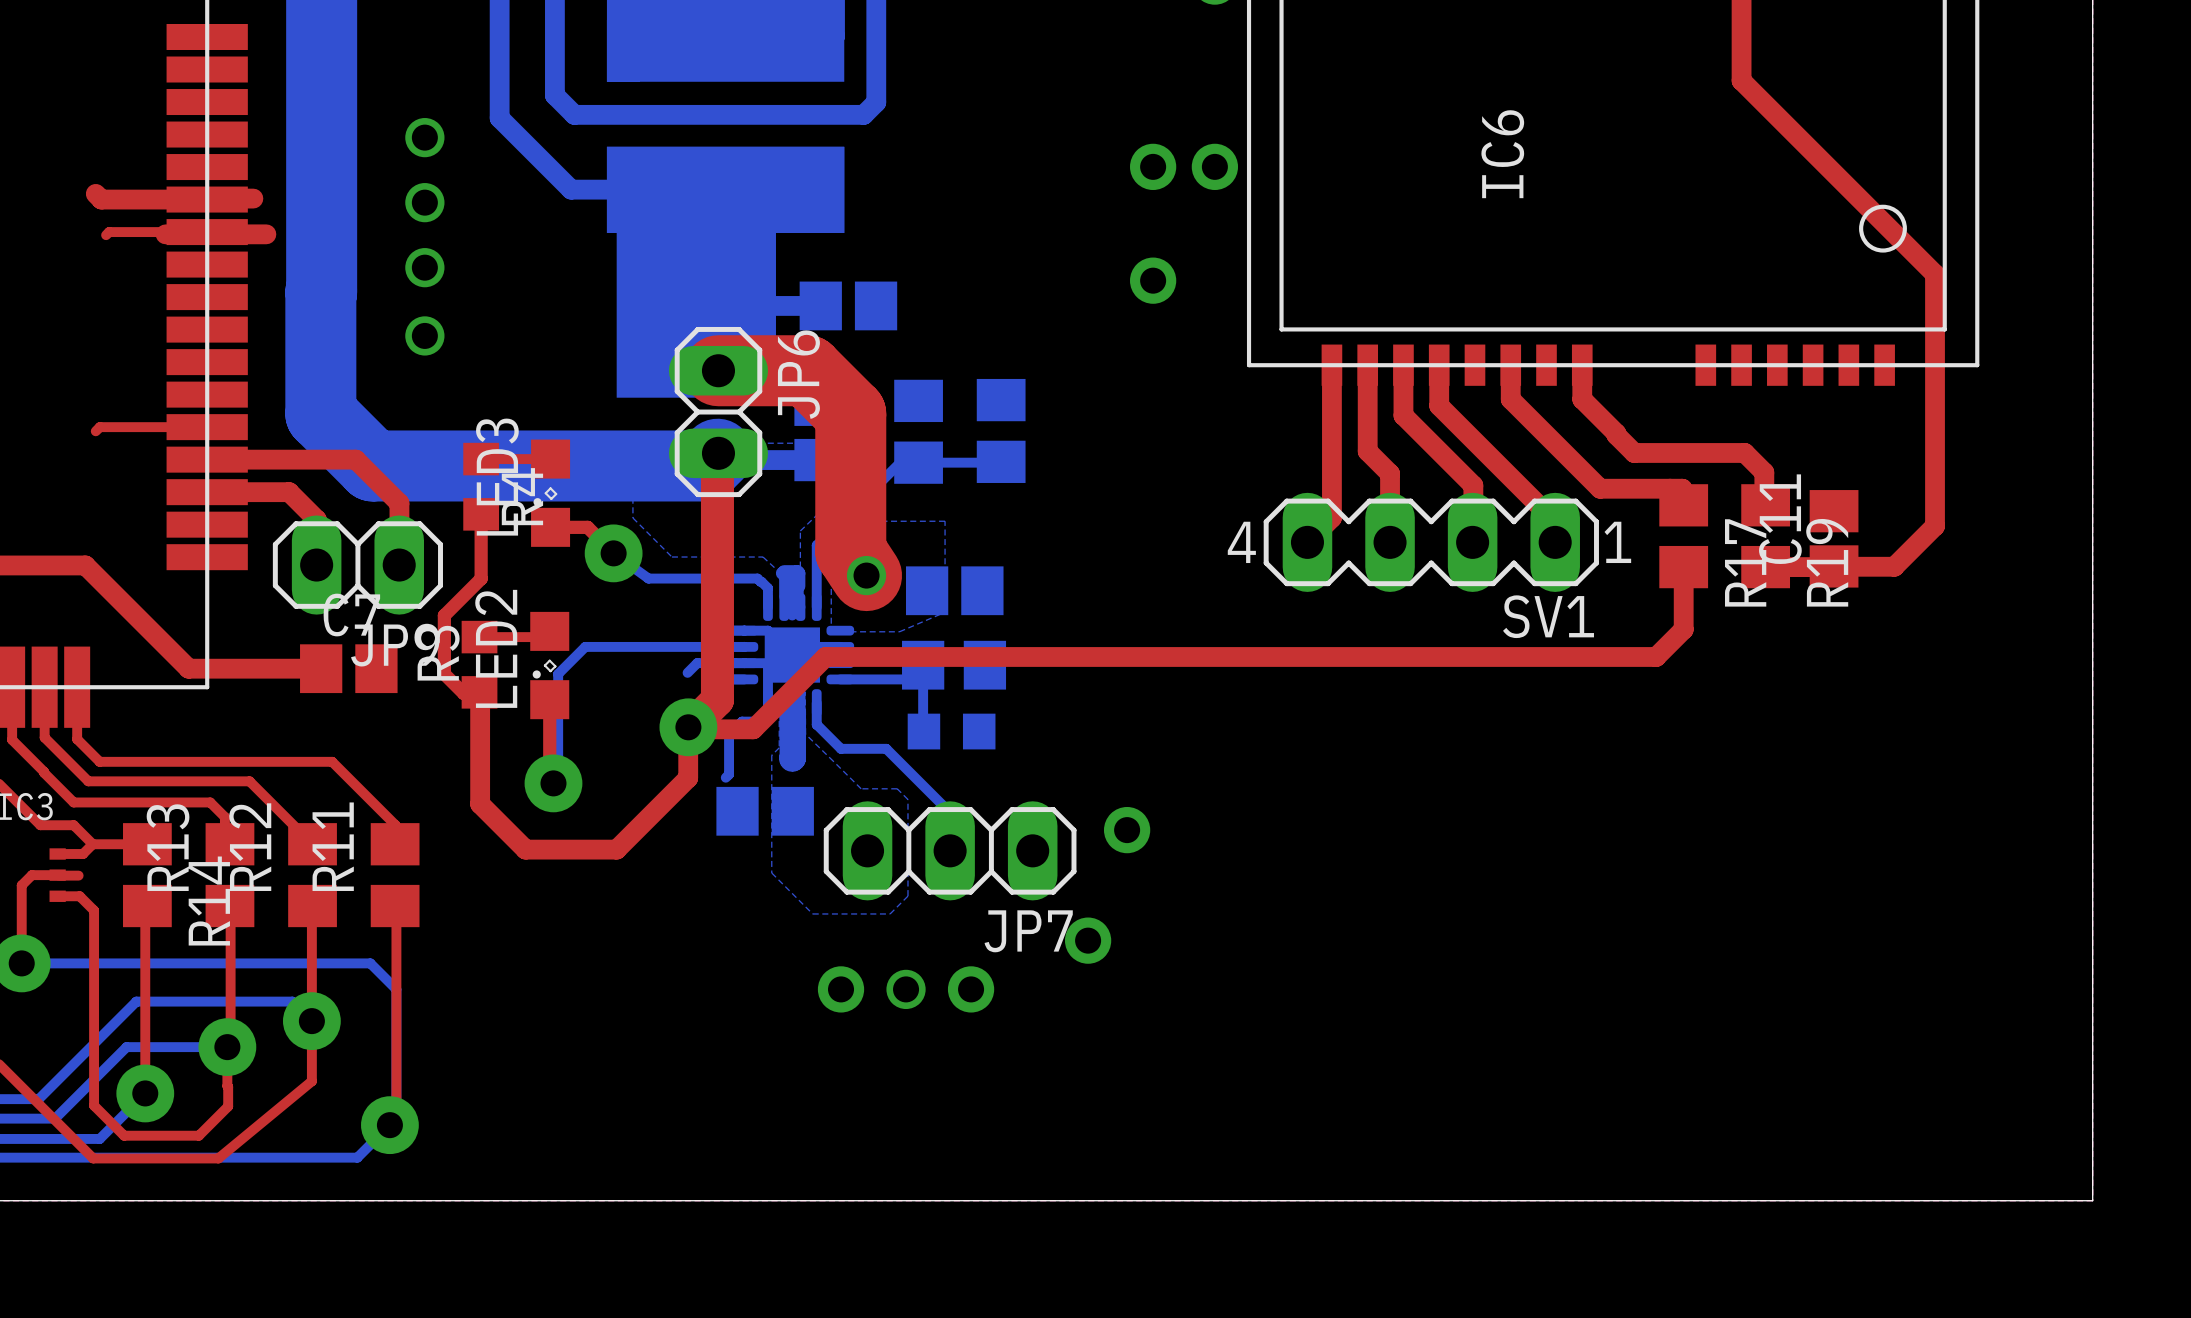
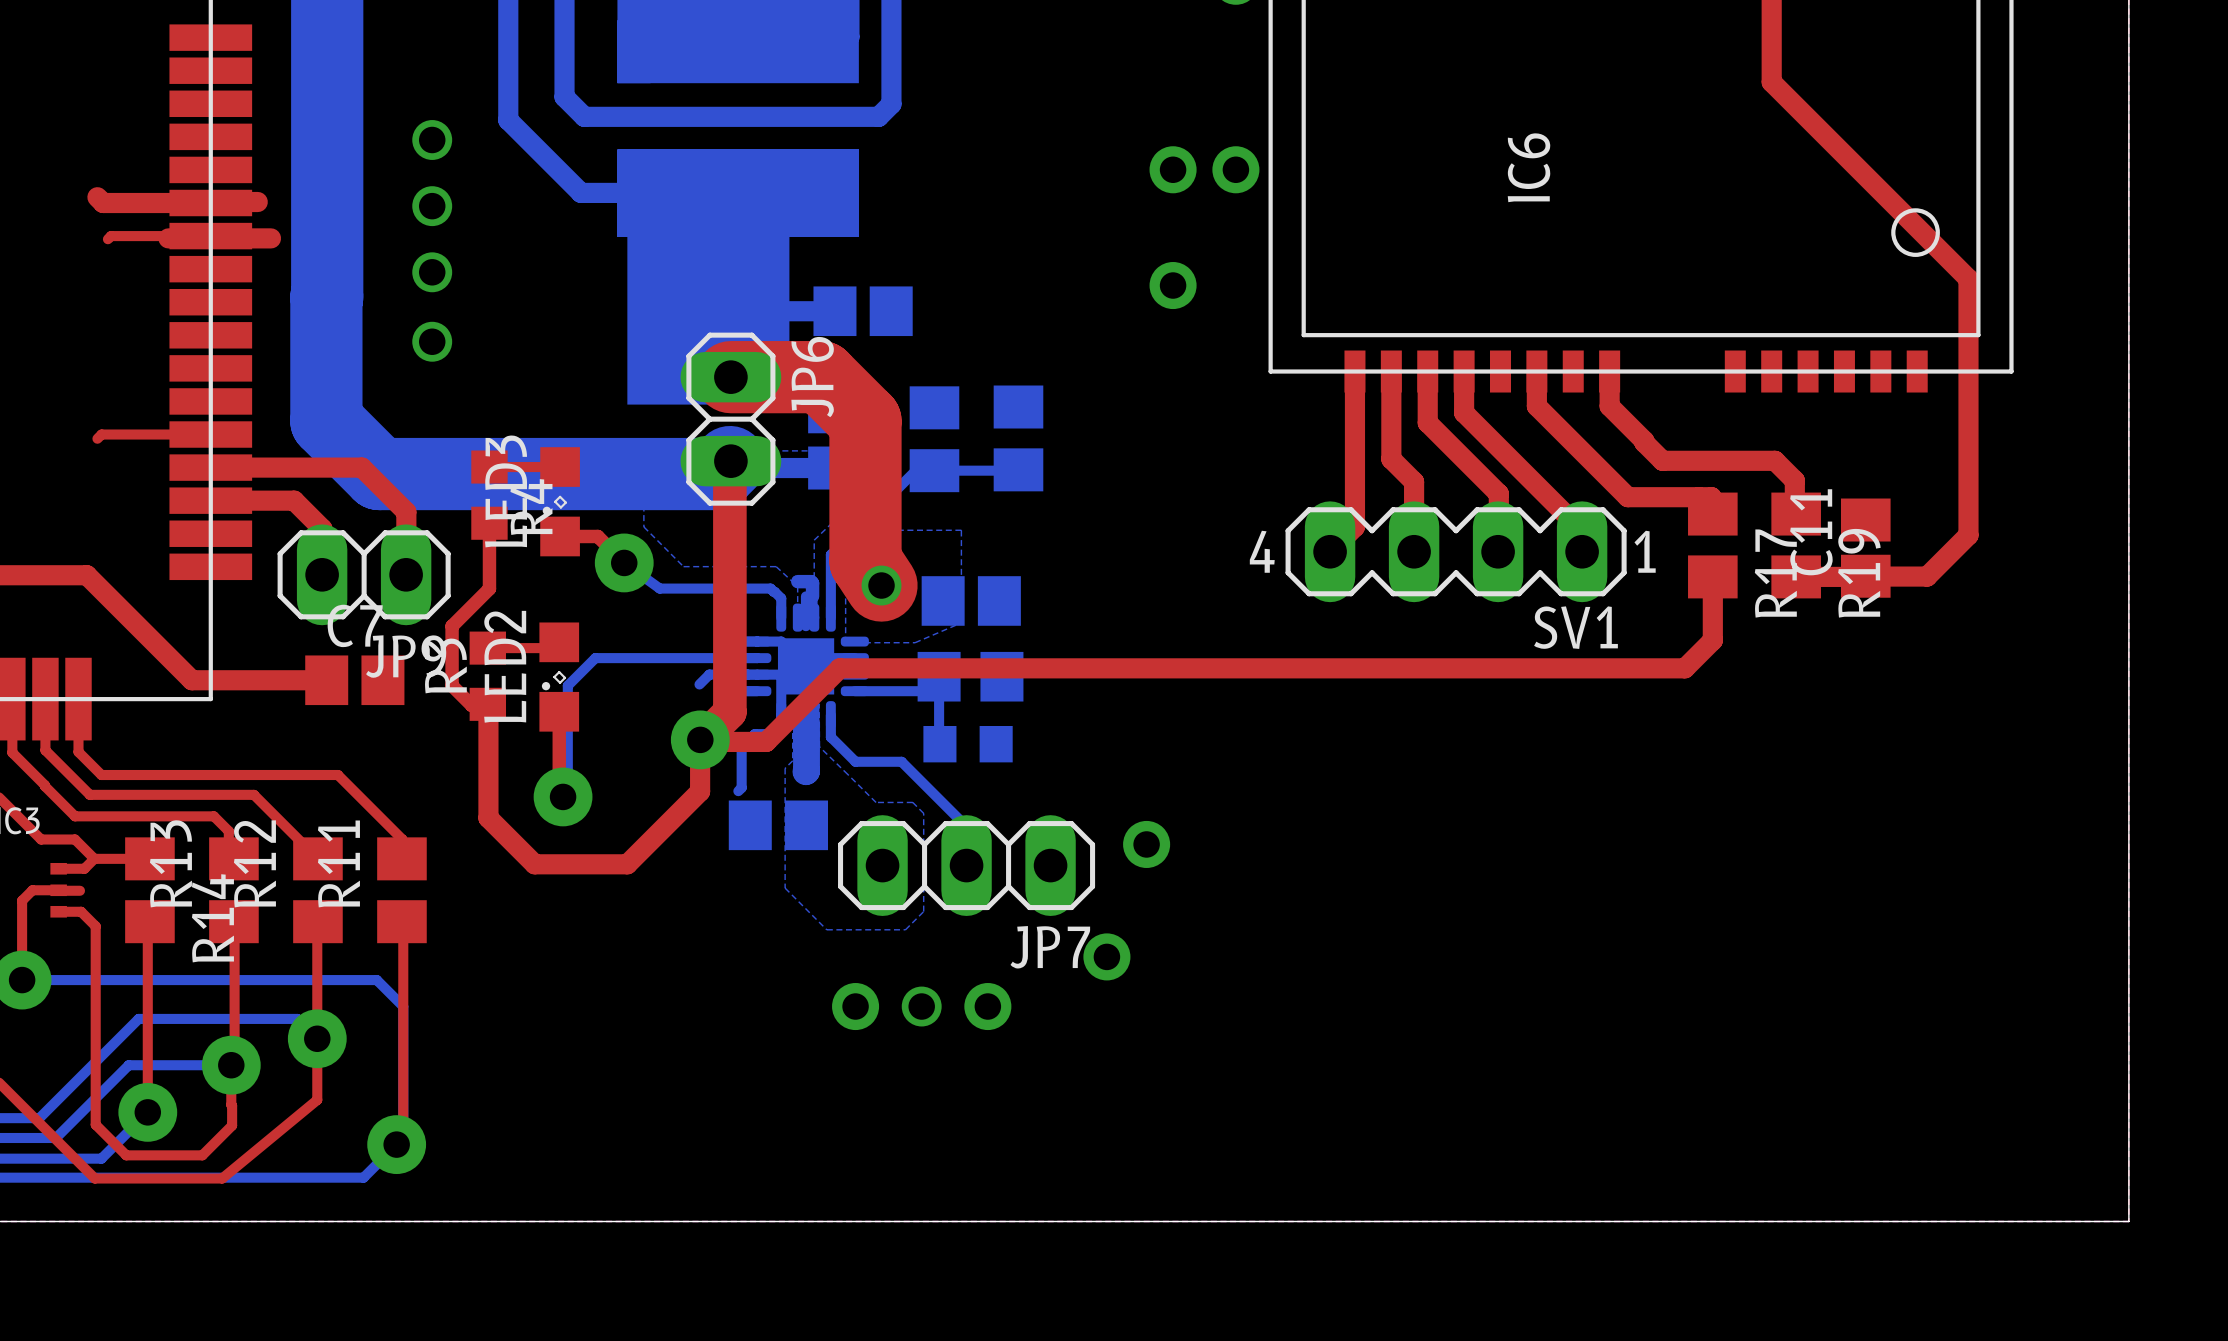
bottom track: (782, 573) (785, 573) (785, 596) -> none

